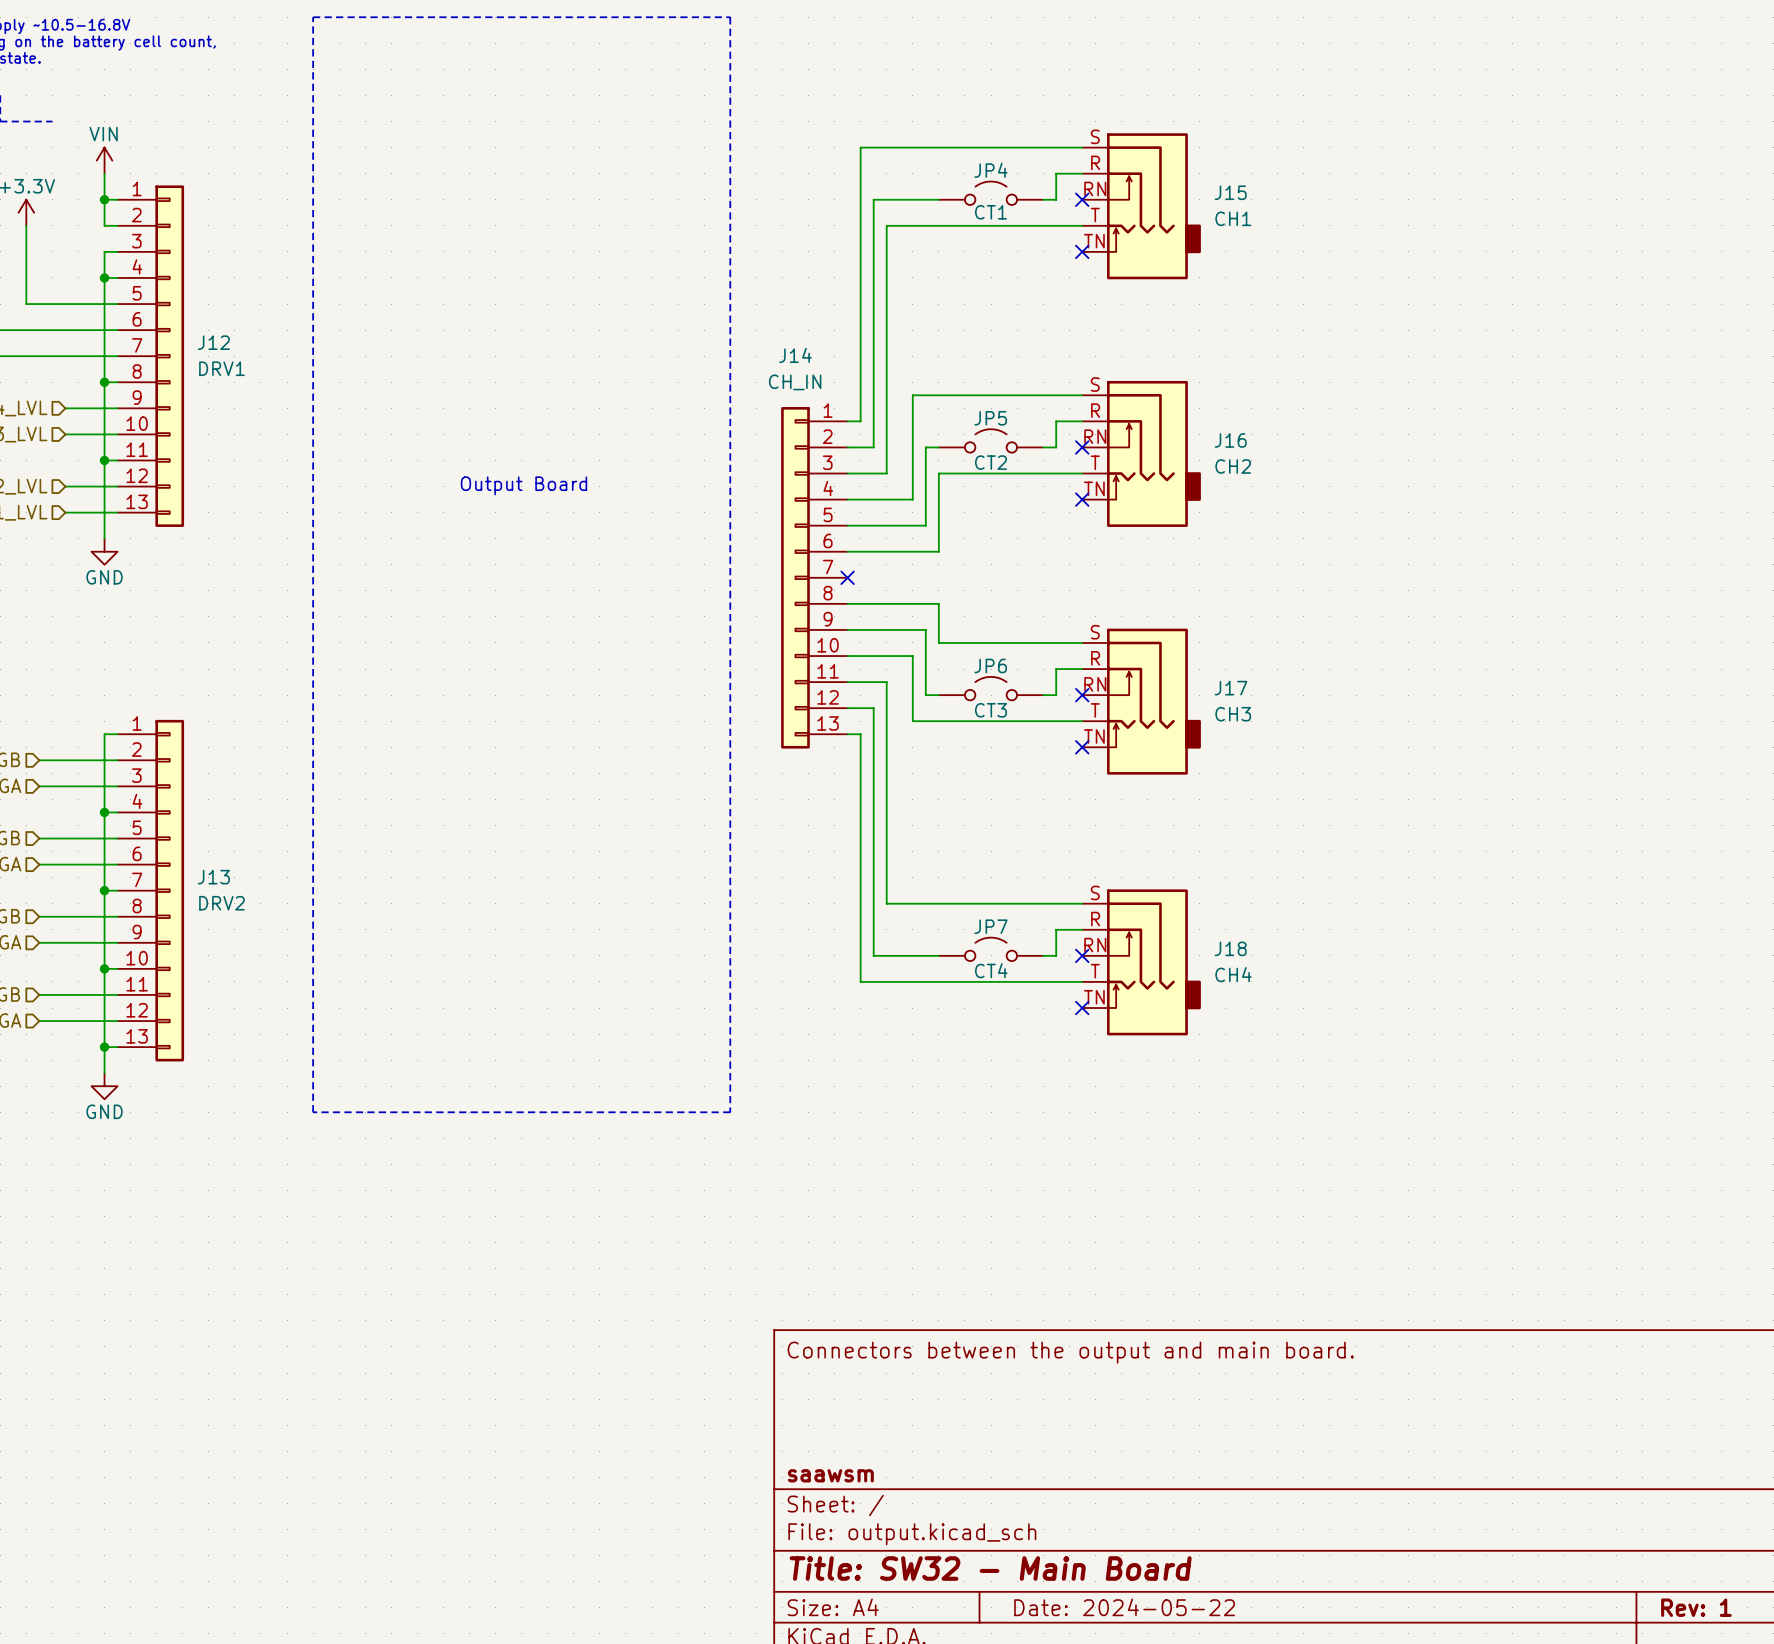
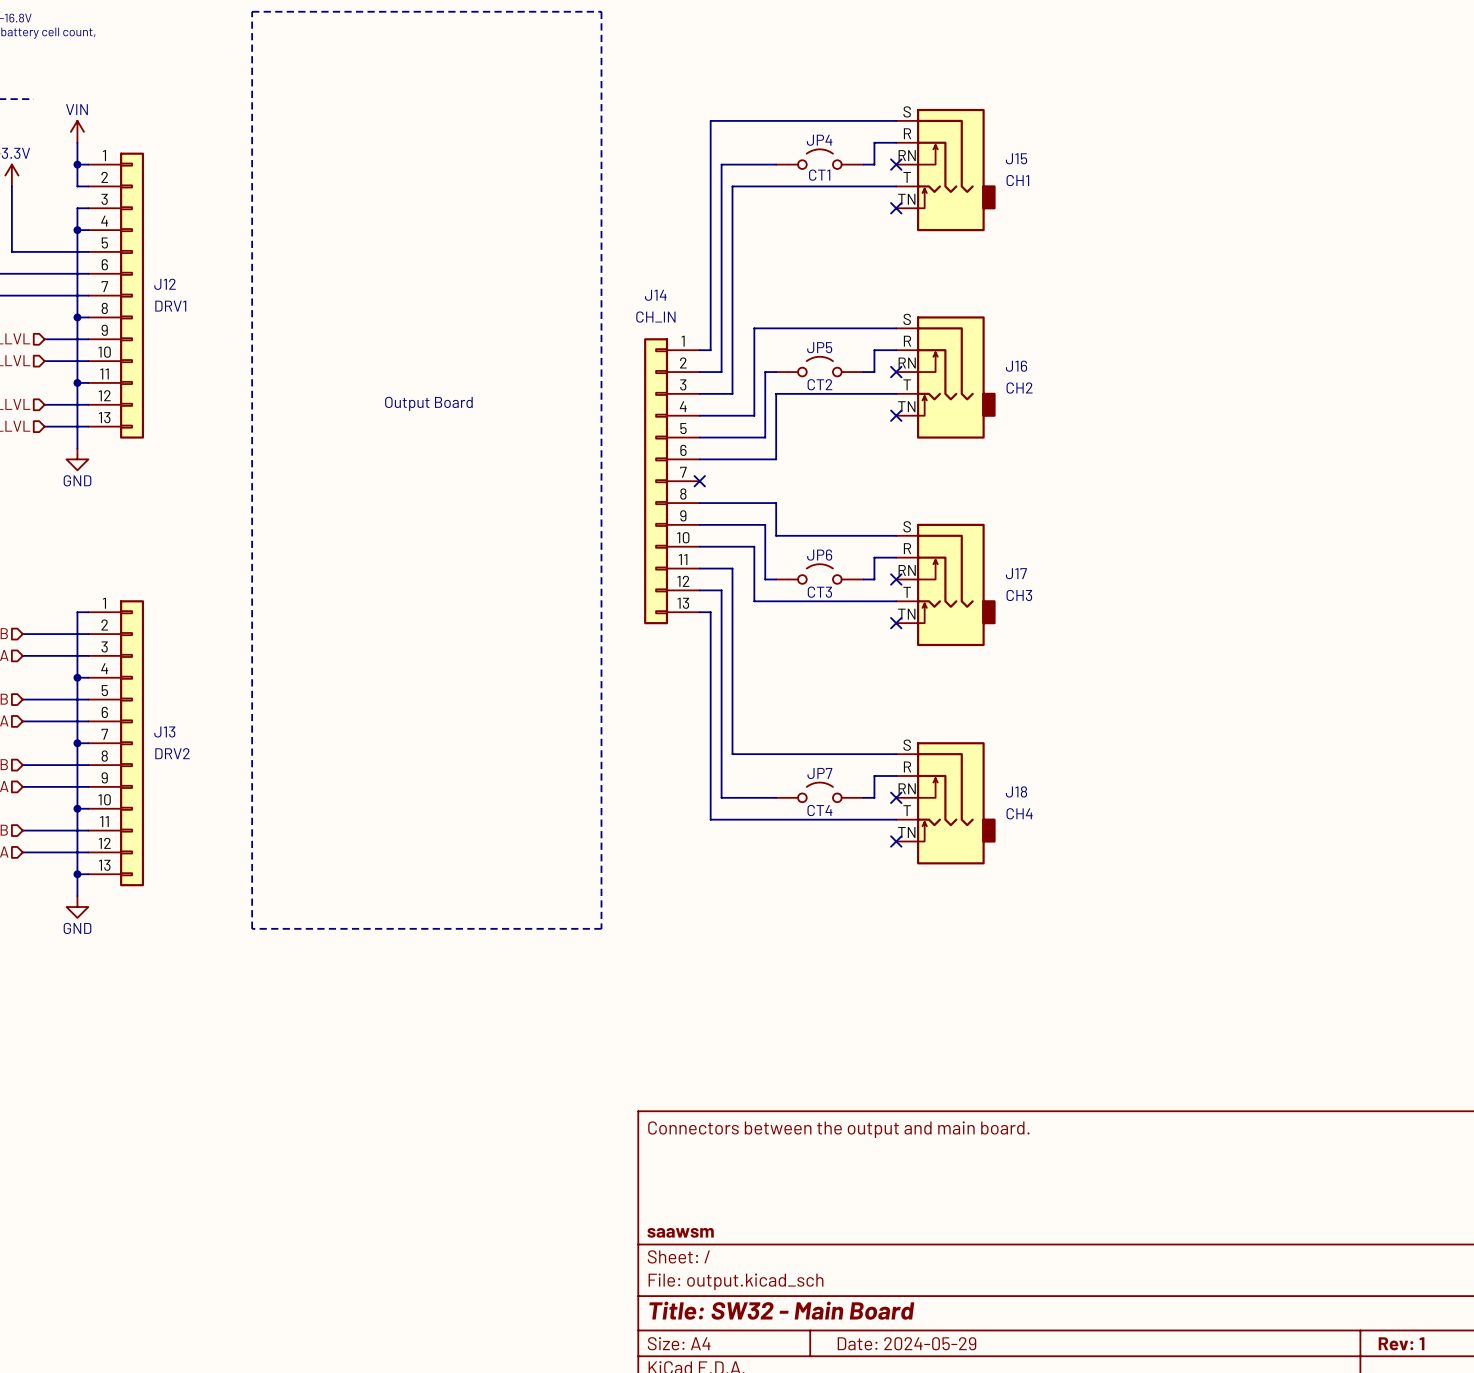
title block: Date: 2024-05-22 (1124, 1607) -> Date: 2024-05-29 (906, 1343)

